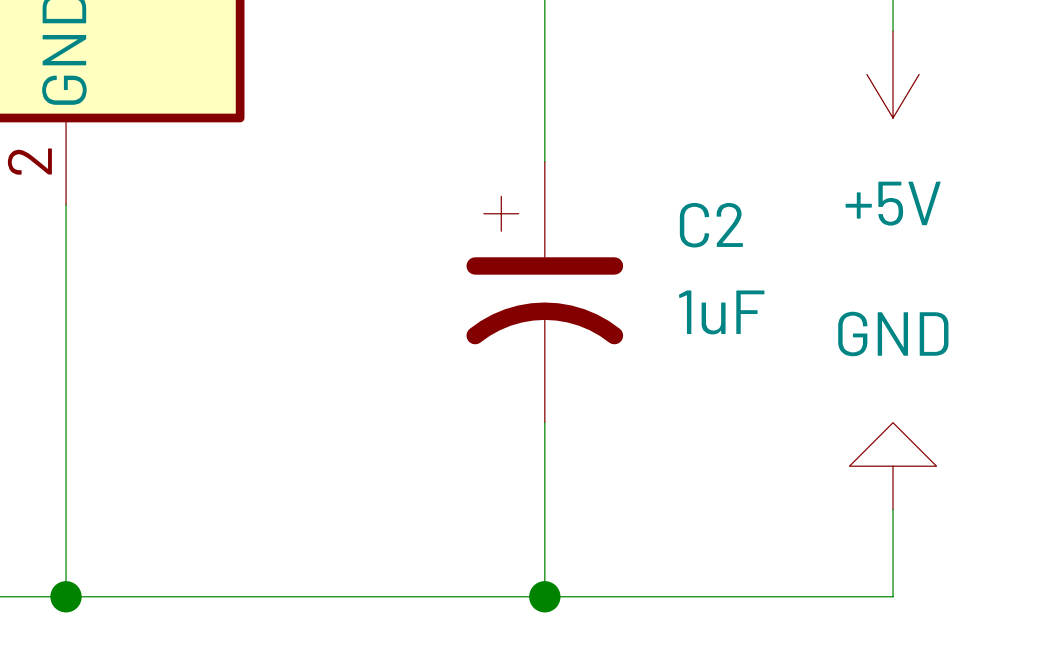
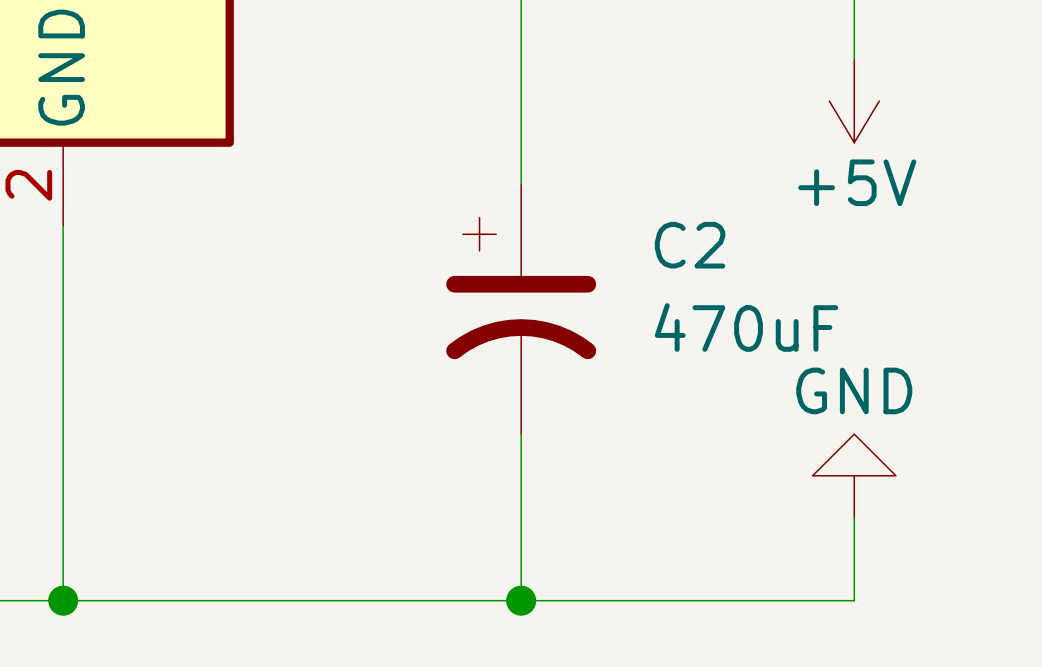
power symbol text position: +5V (893, 203) -> +5V (857, 182)
C2 value: 1uF (721, 312) -> 470uF (746, 327)
power symbol text position: GND (893, 334) -> GND (854, 390)

